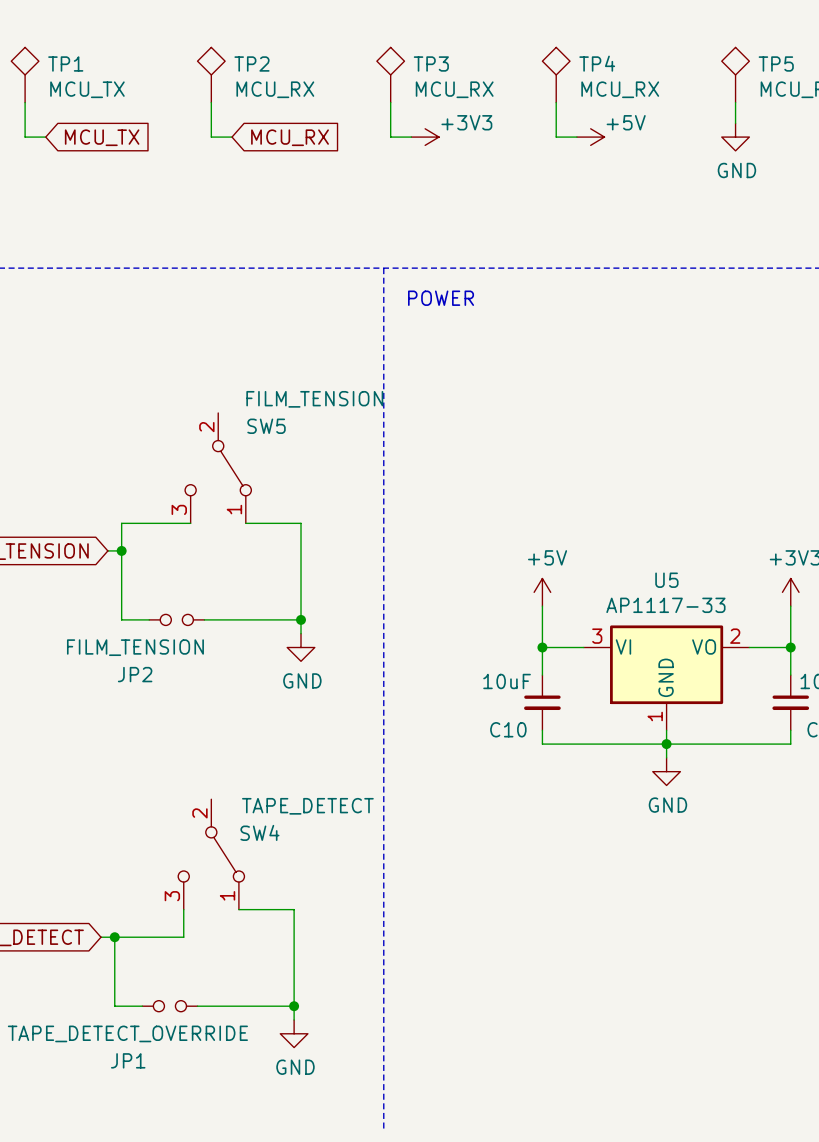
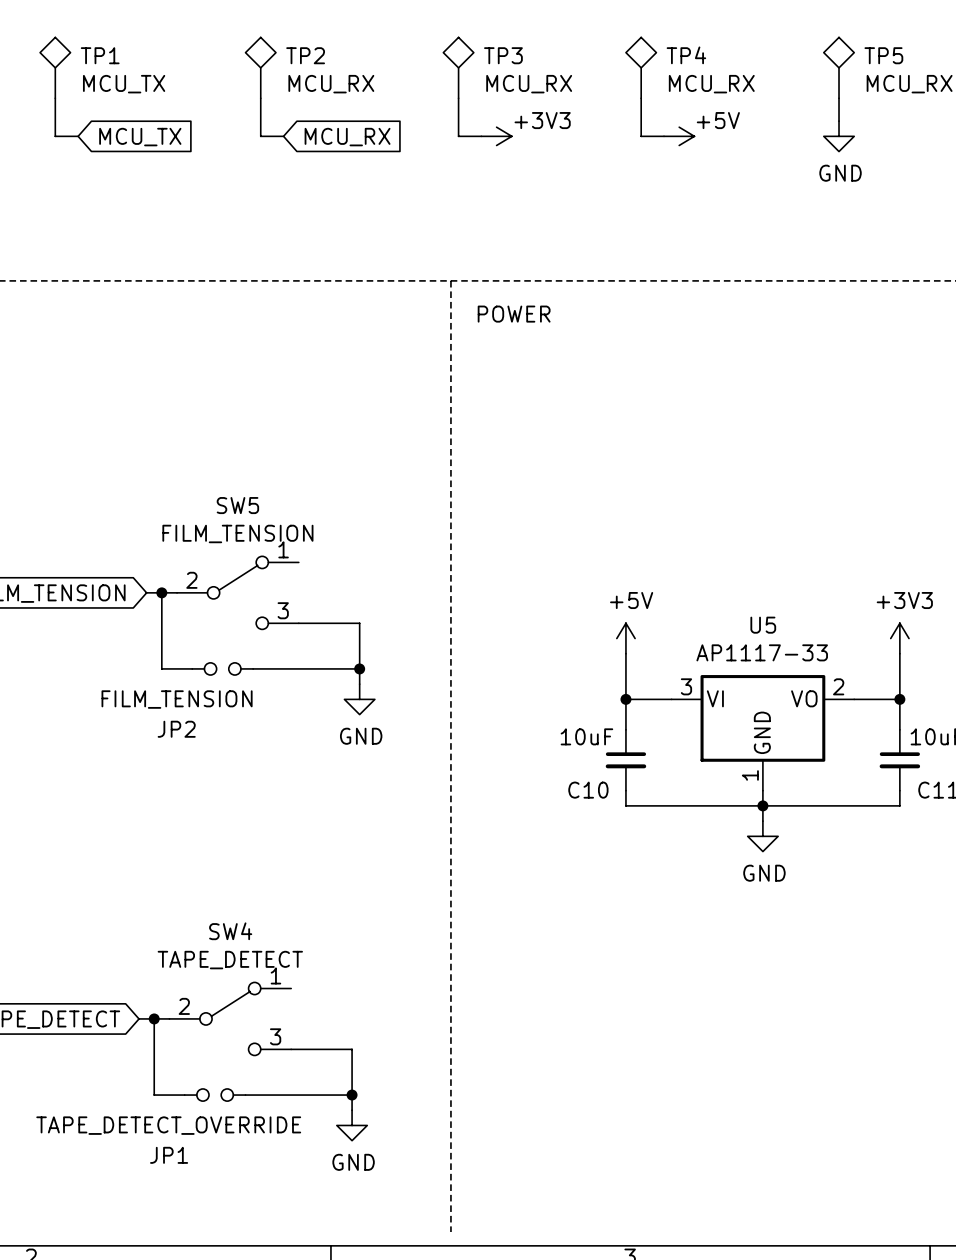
SW5 value position: FILM_TENSION (314, 399) -> FILM_TENSION (237, 533)
SW5 name position: SW5 (266, 426) -> SW5 (237, 505)
SW5 rotation: 0° (218, 468) -> 90° counterclockwise (237, 592)
SW5 position: (218, 468) -> (237, 592)
wire: (190, 523) (121, 523) (121, 550) -> (177, 592) (161, 592)
wire: (245, 523) (301, 523) (301, 578) -> (298, 623) (359, 623)
SW4 value position: TAPE_DETECT (307, 806) -> TAPE_DETECT (230, 960)
SW4 name position: SW4 (259, 832) -> SW4 (230, 931)
SW4 rotation: 0° (211, 854) -> 90° counterclockwise (230, 1018)
SW4 position: (211, 854) -> (230, 1018)
wire: (183, 909) (183, 937) (128, 937) -> none
wire: (238, 909) (294, 909) (294, 964) -> (291, 1049) (352, 1049)

